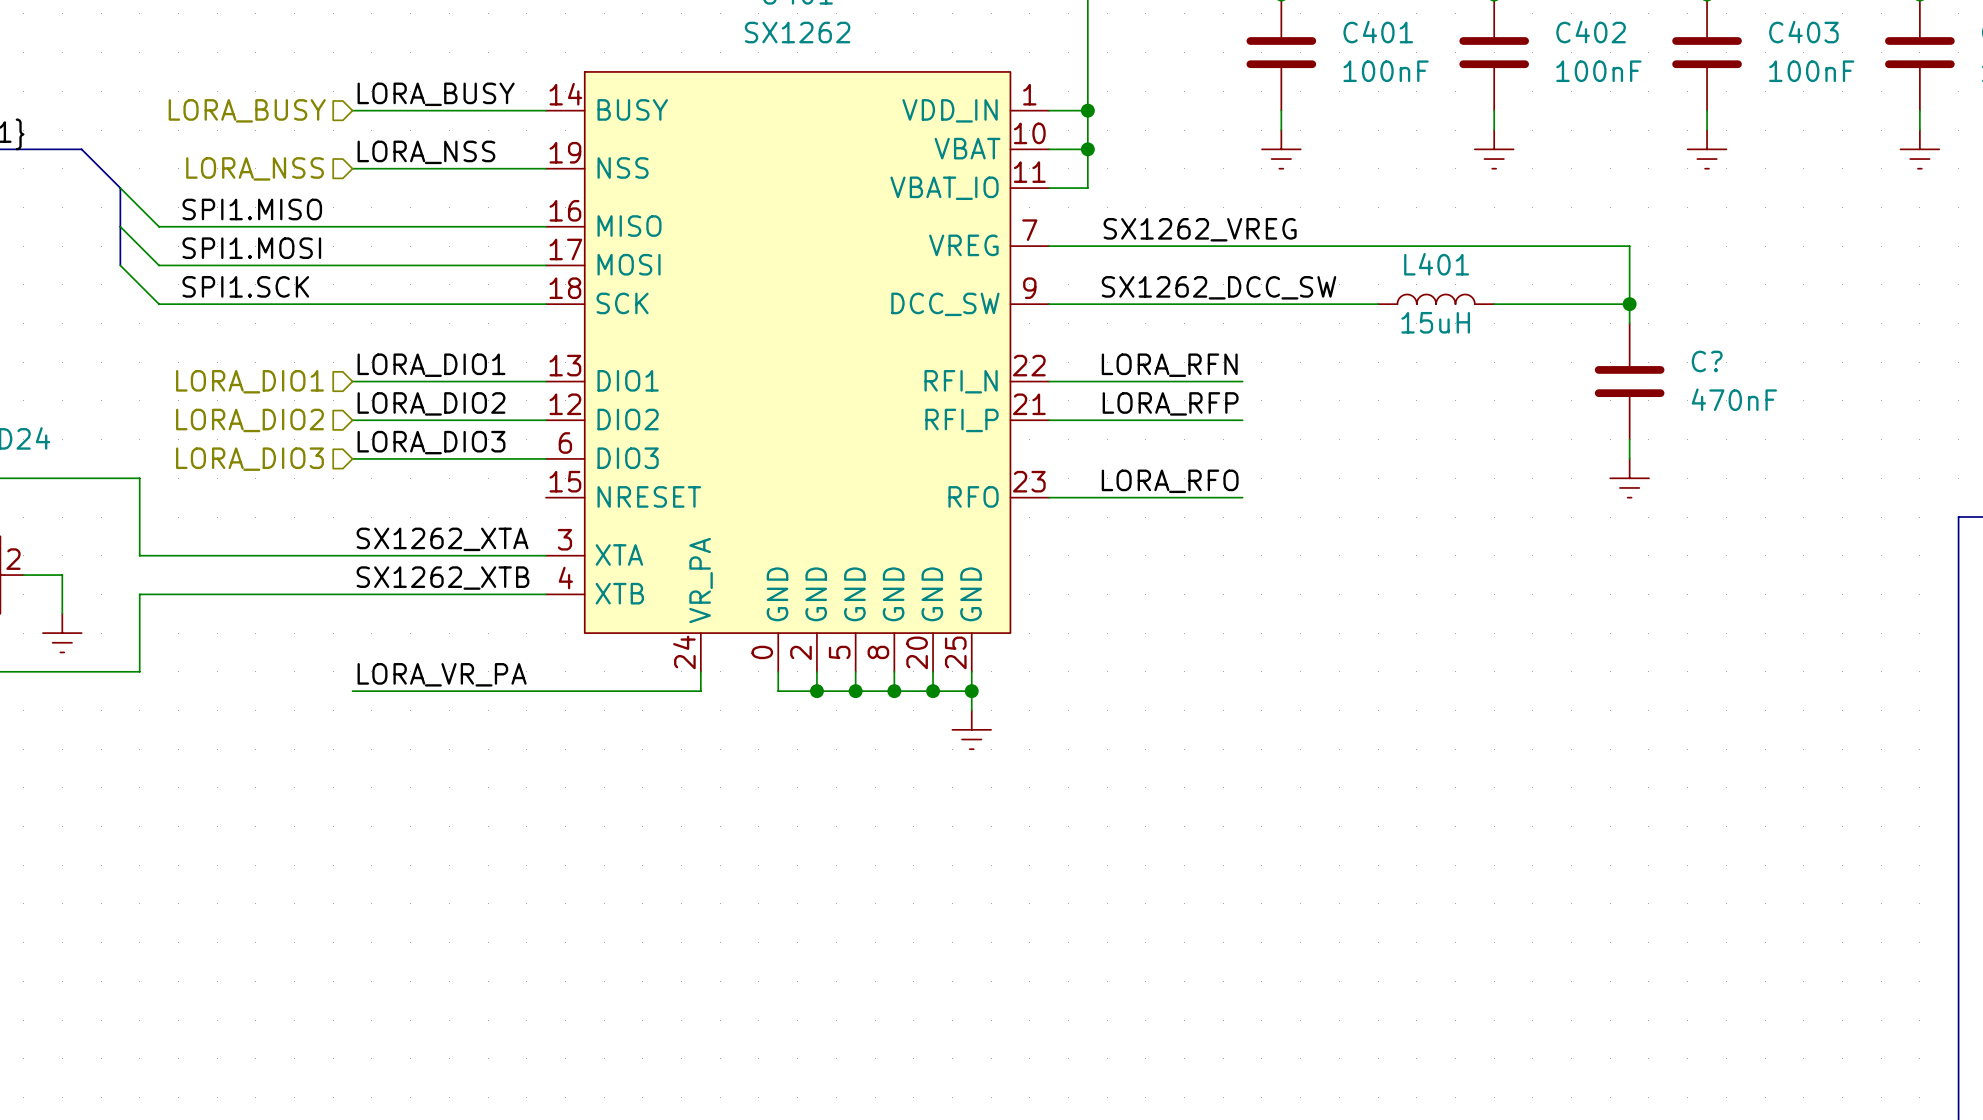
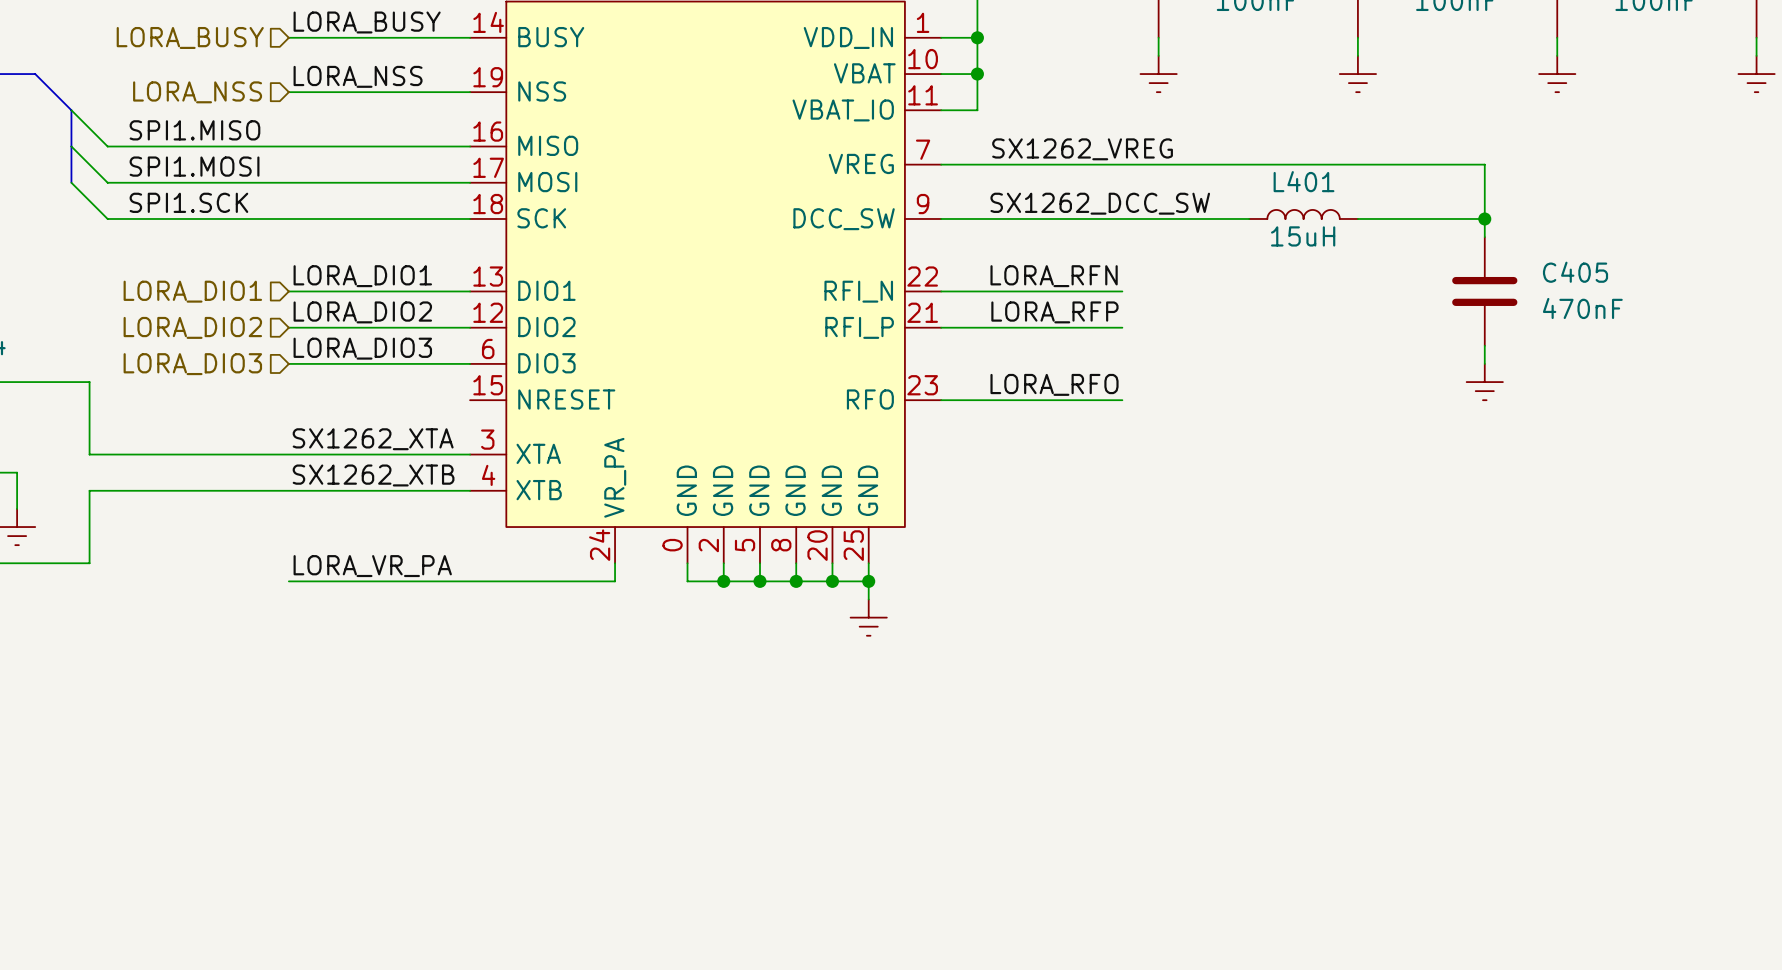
C? name: C? (1707, 361) -> C405 (1575, 272)

